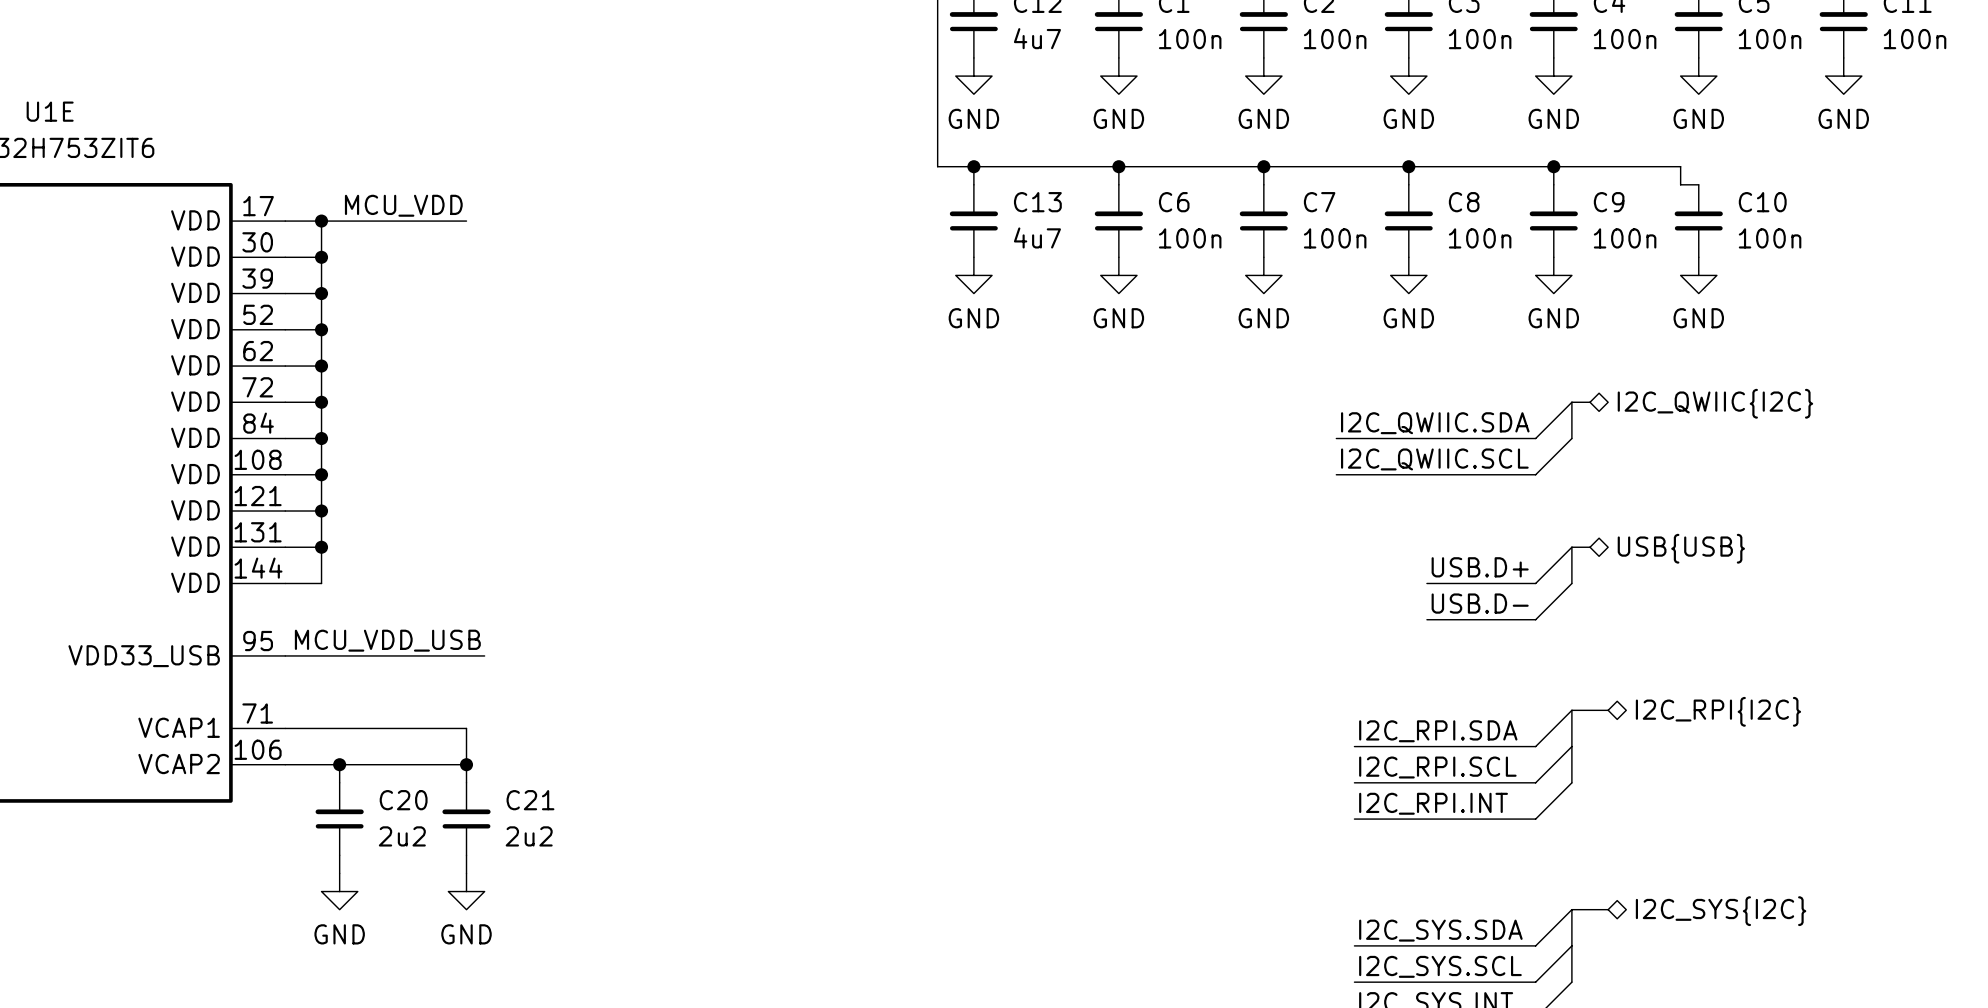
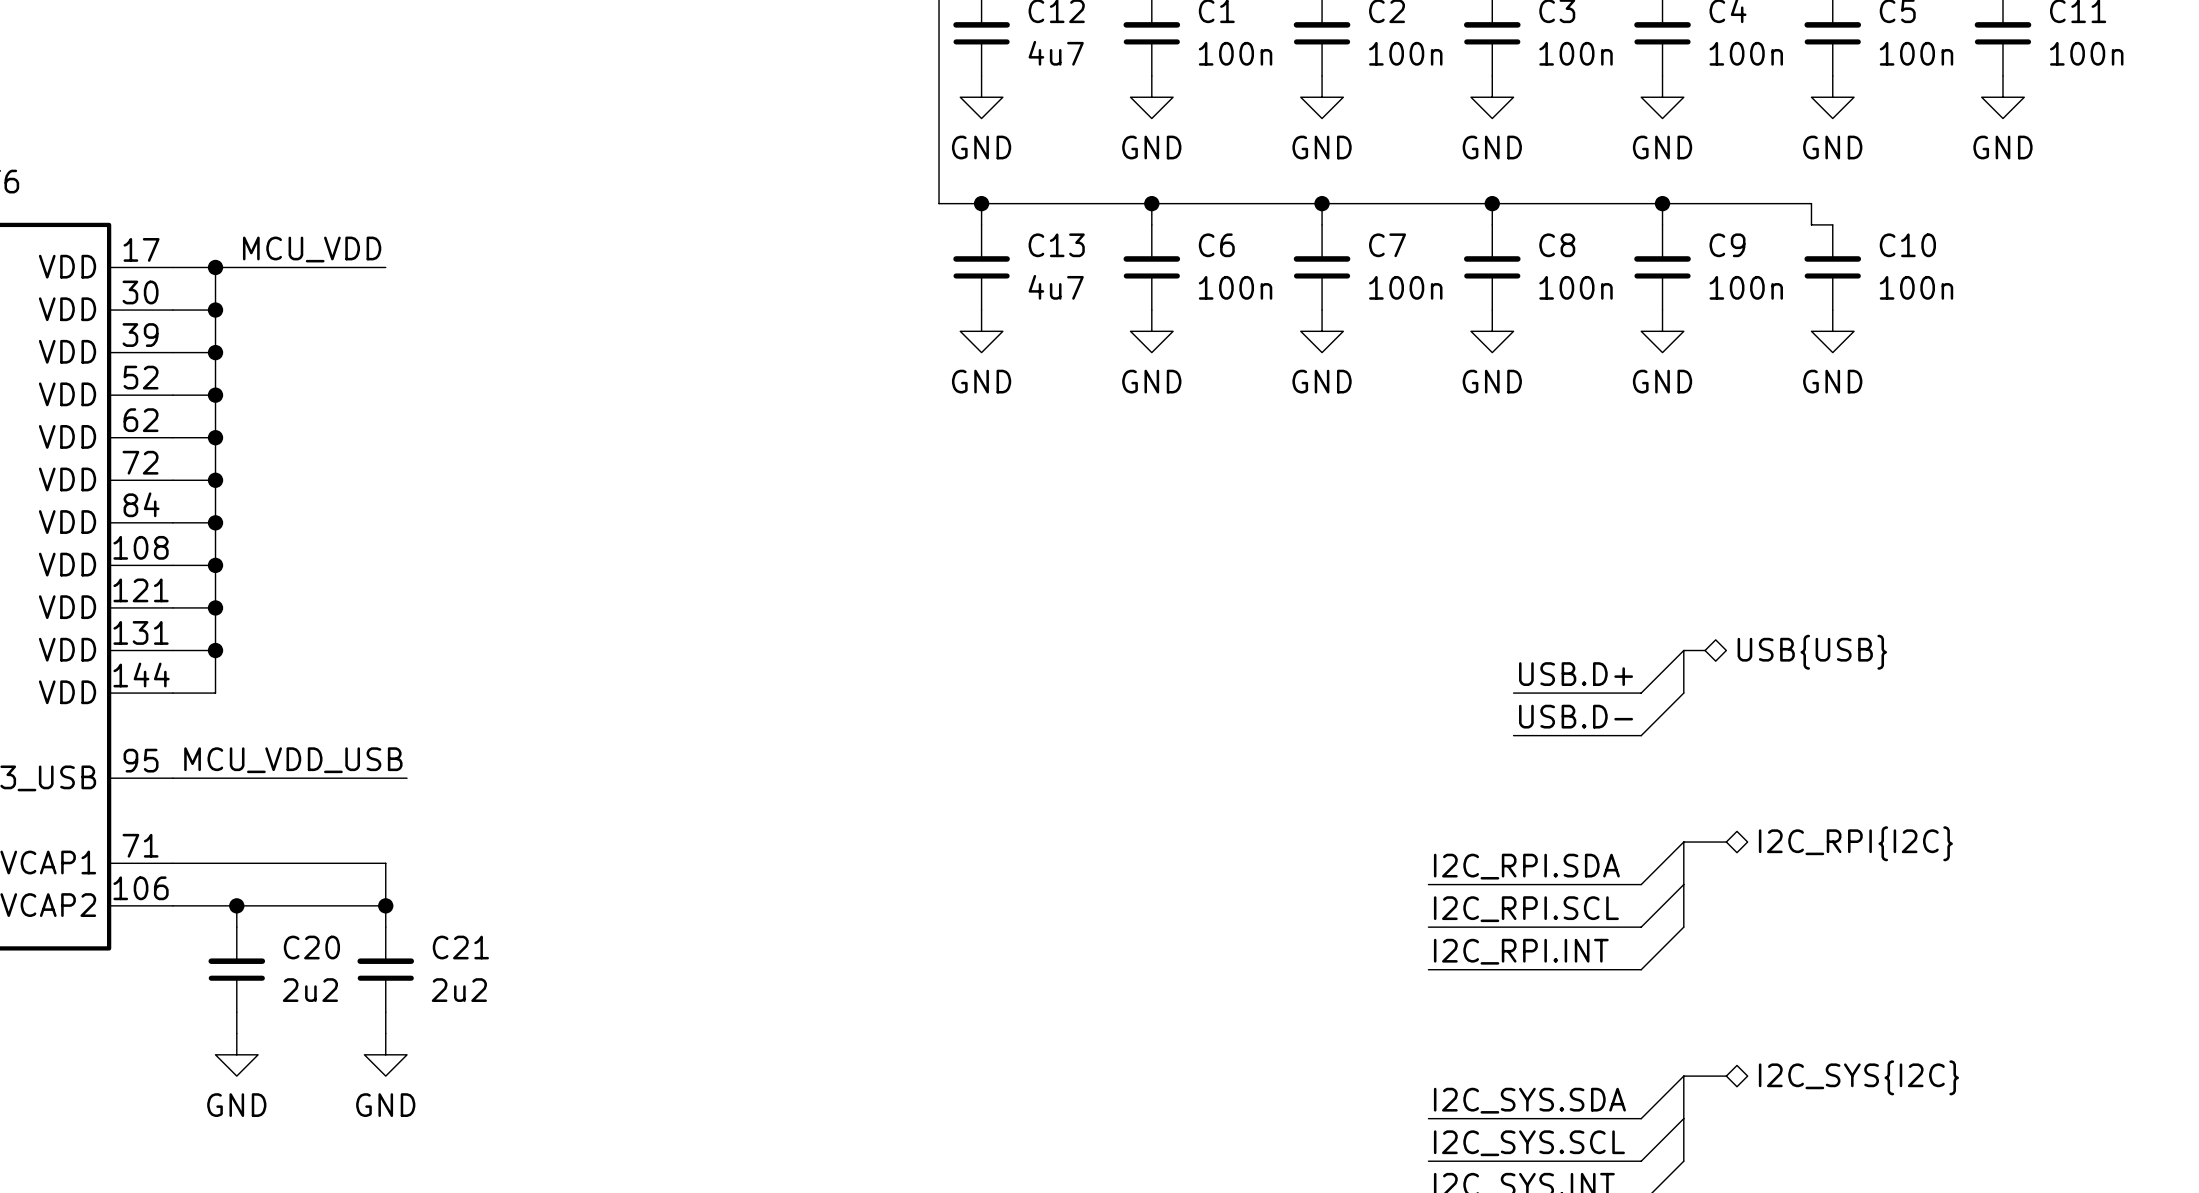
wire: (1571, 402) (1535, 438) (1336, 438) -> none
bus: (1590, 402) (1571, 402) (1571, 438) -> none
hierarchical label: I2C_QWIIC{I2C} (1715, 403) -> none
label: I2C_QWIIC.SDA (1435, 423) -> none
wire: (1571, 438) (1535, 474) (1336, 474) -> none
label: I2C_QWIIC.SCL (1434, 459) -> none

